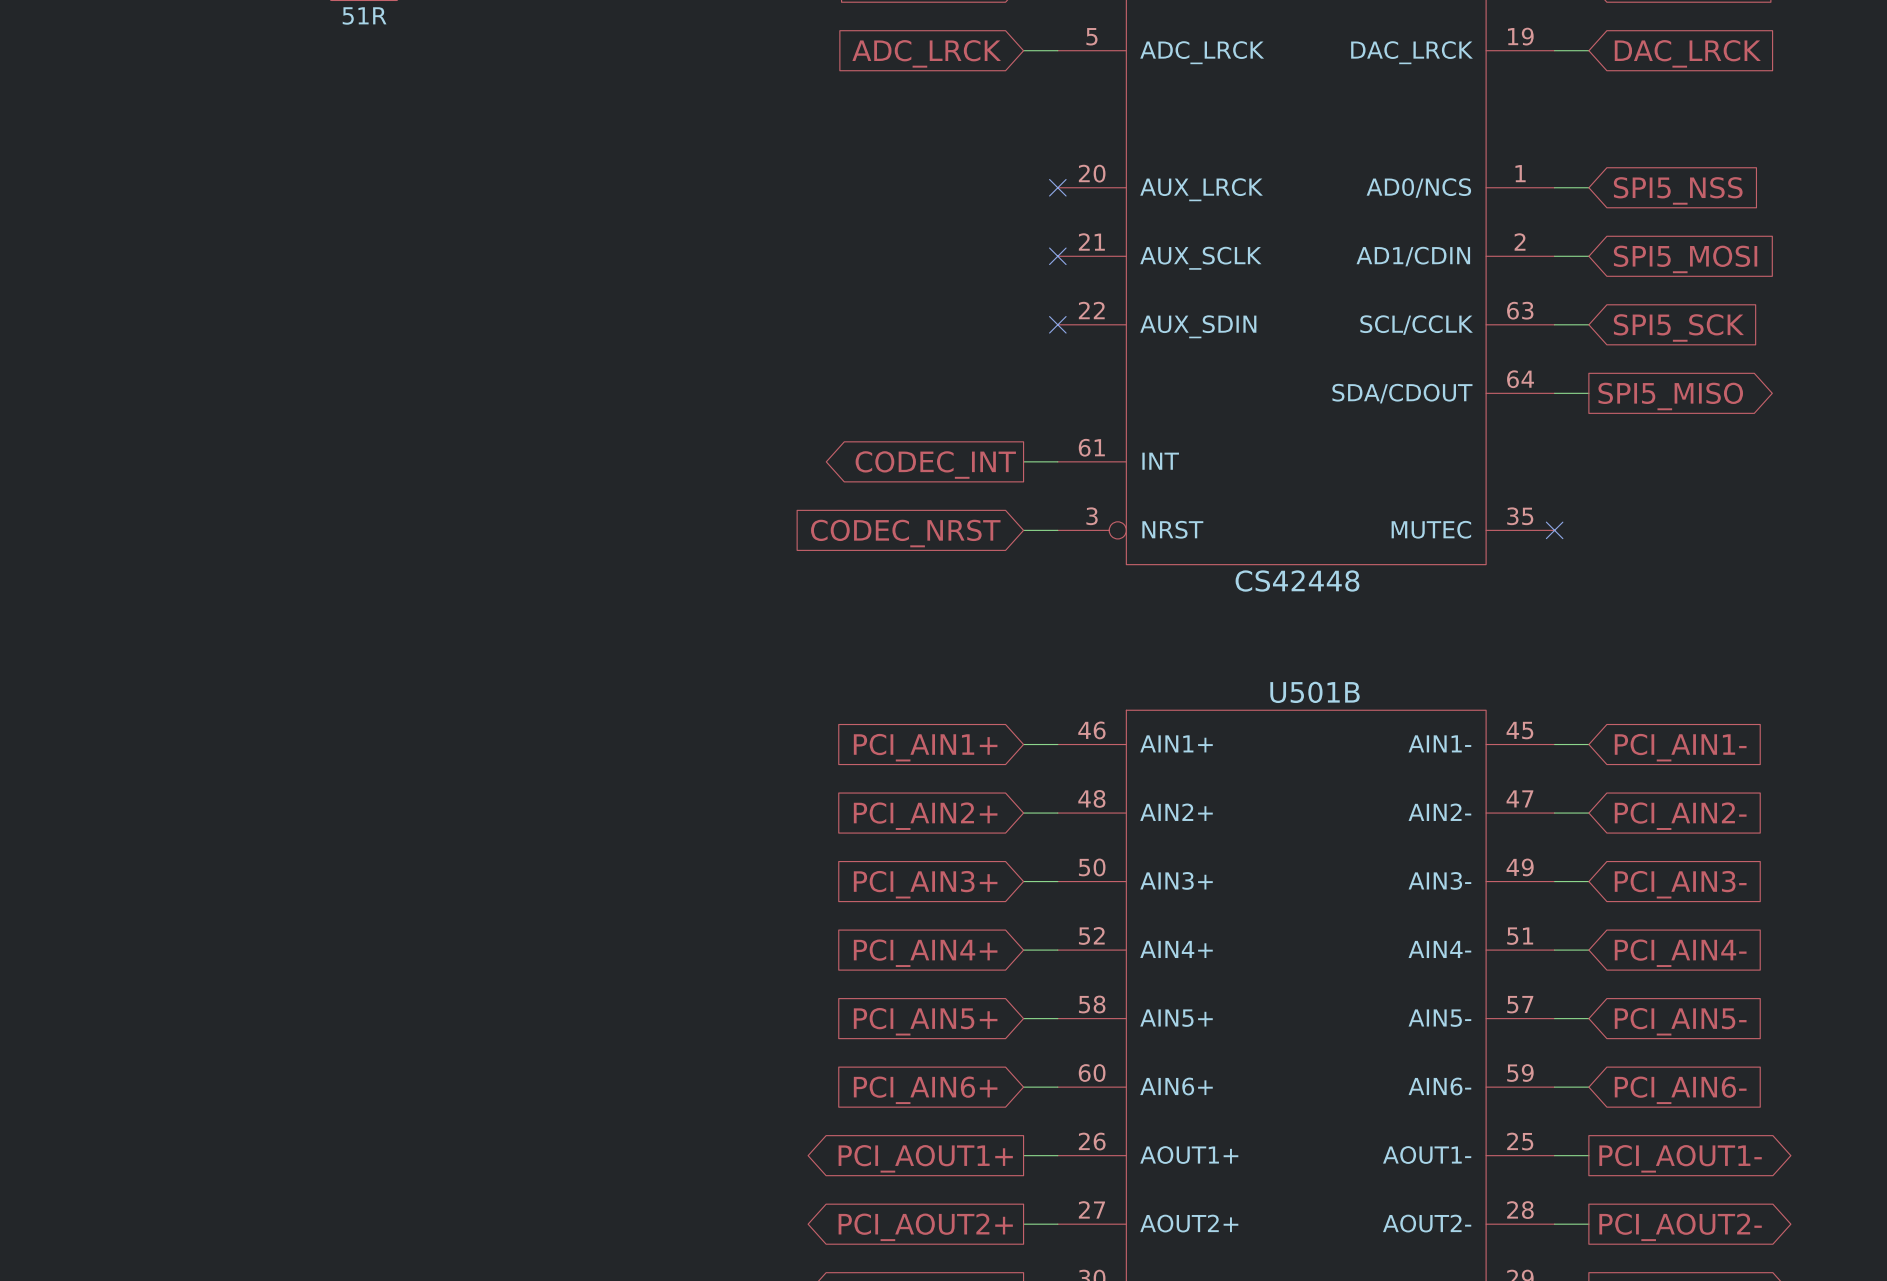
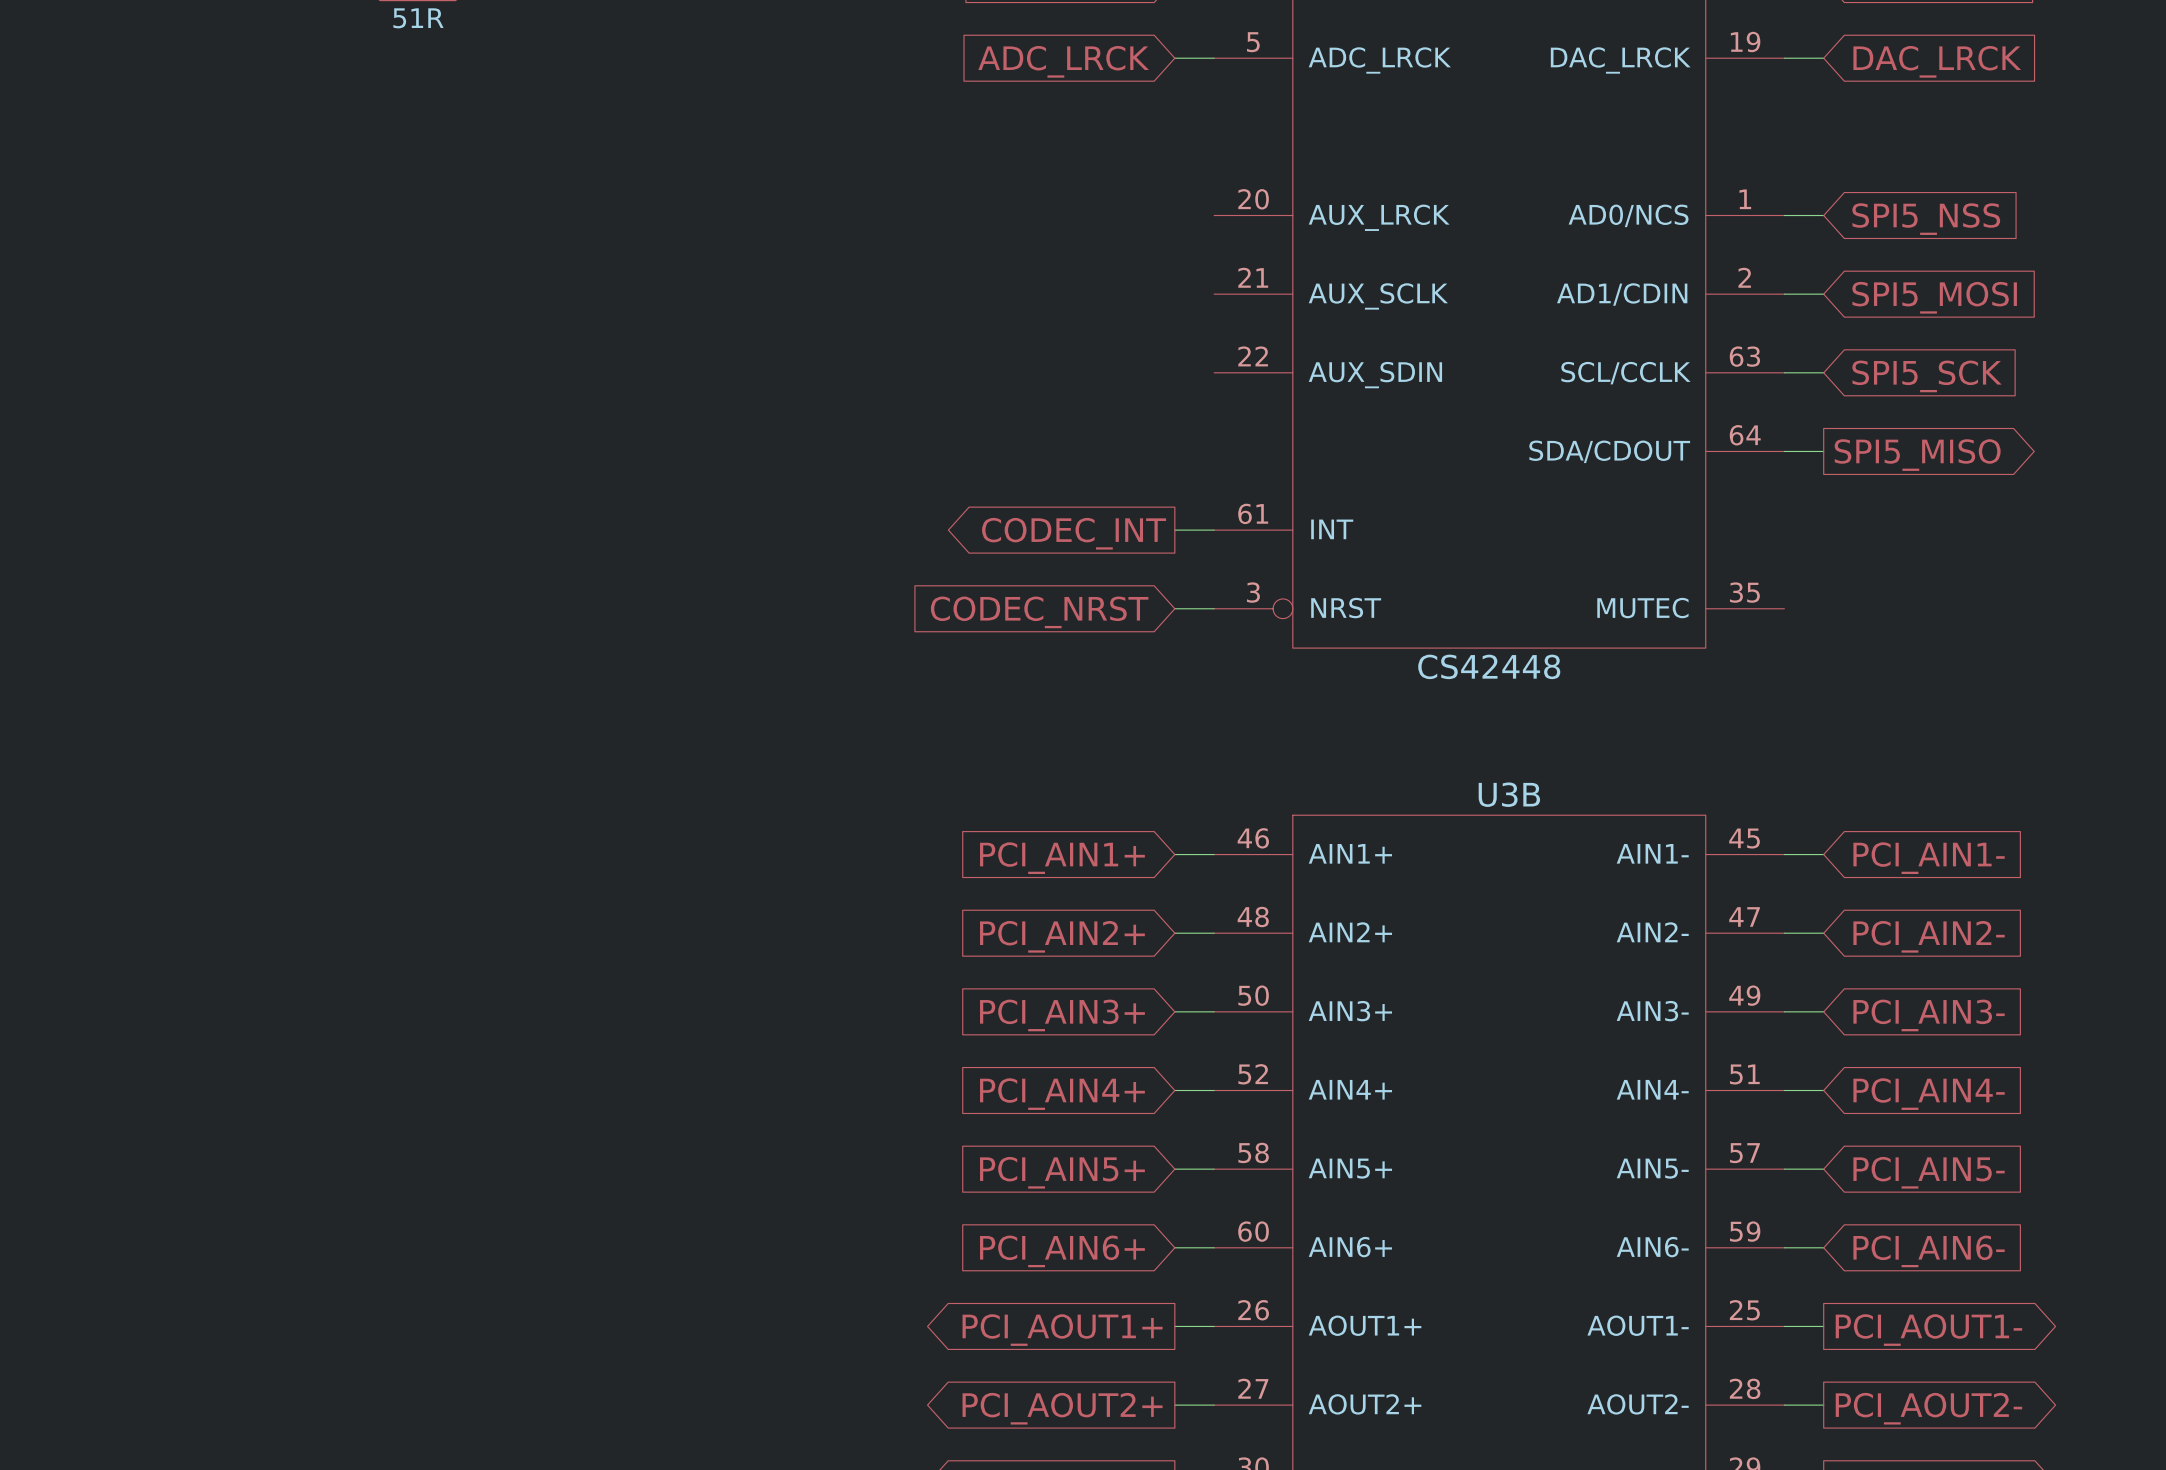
no-connect mark: (1057, 187) -> none
no-connect mark: (1057, 256) -> none
no-connect mark: (1057, 324) -> none
no-connect mark: (1554, 530) -> none
U501B name: U501B (1315, 692) -> U3B (1509, 794)

